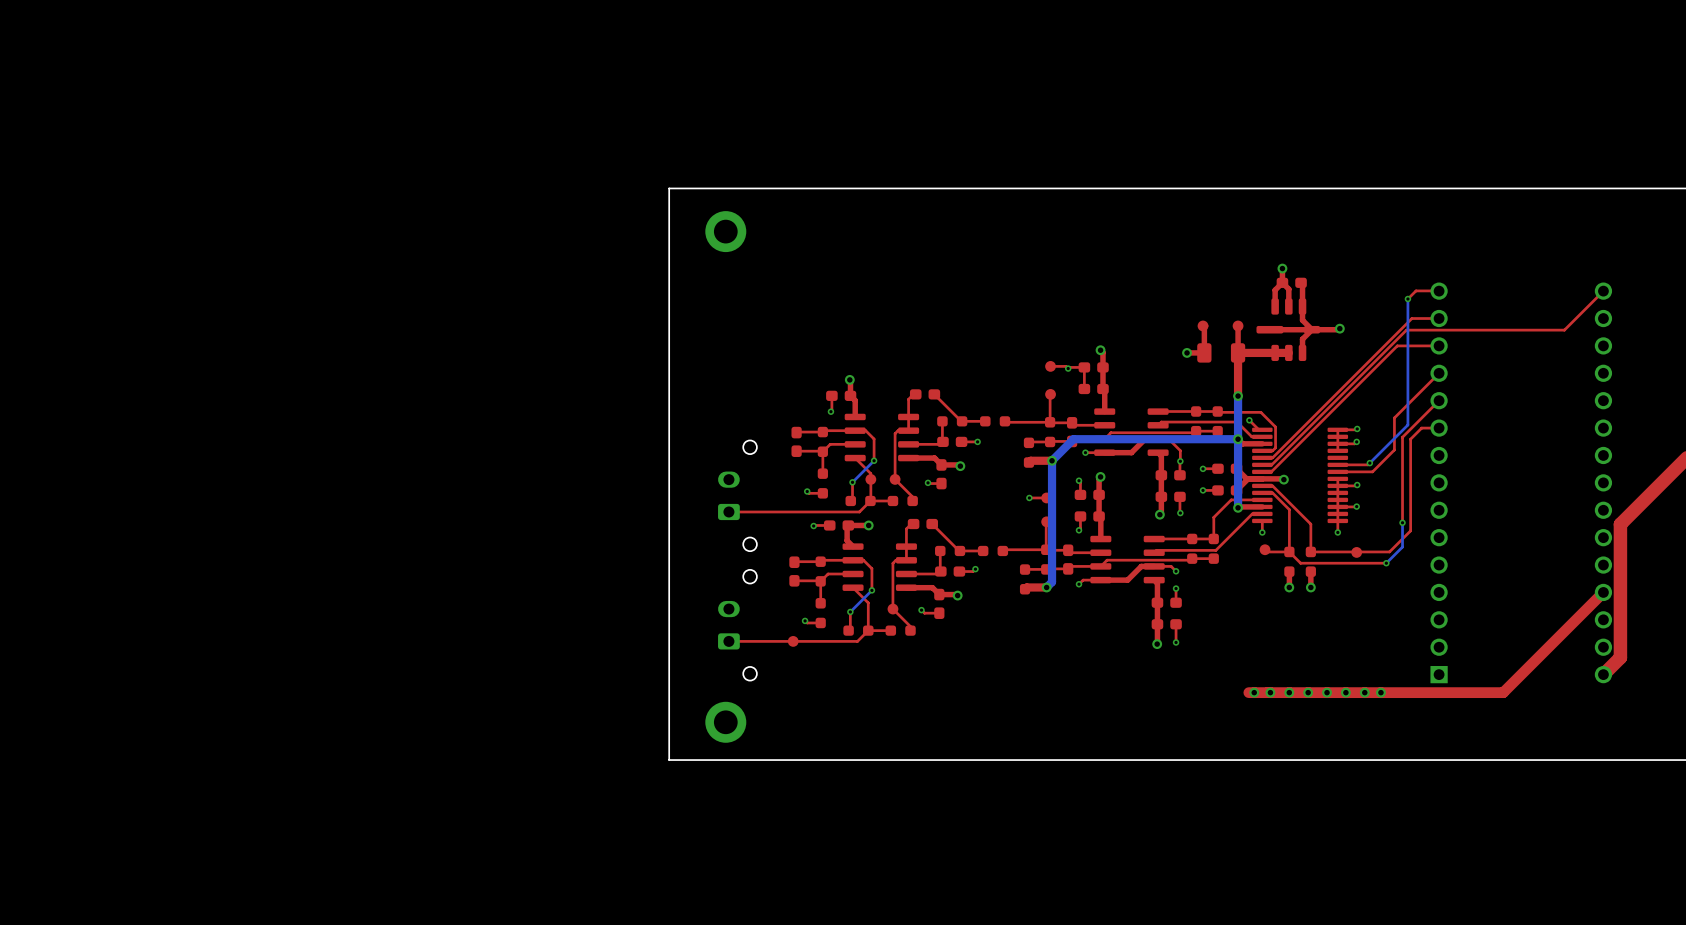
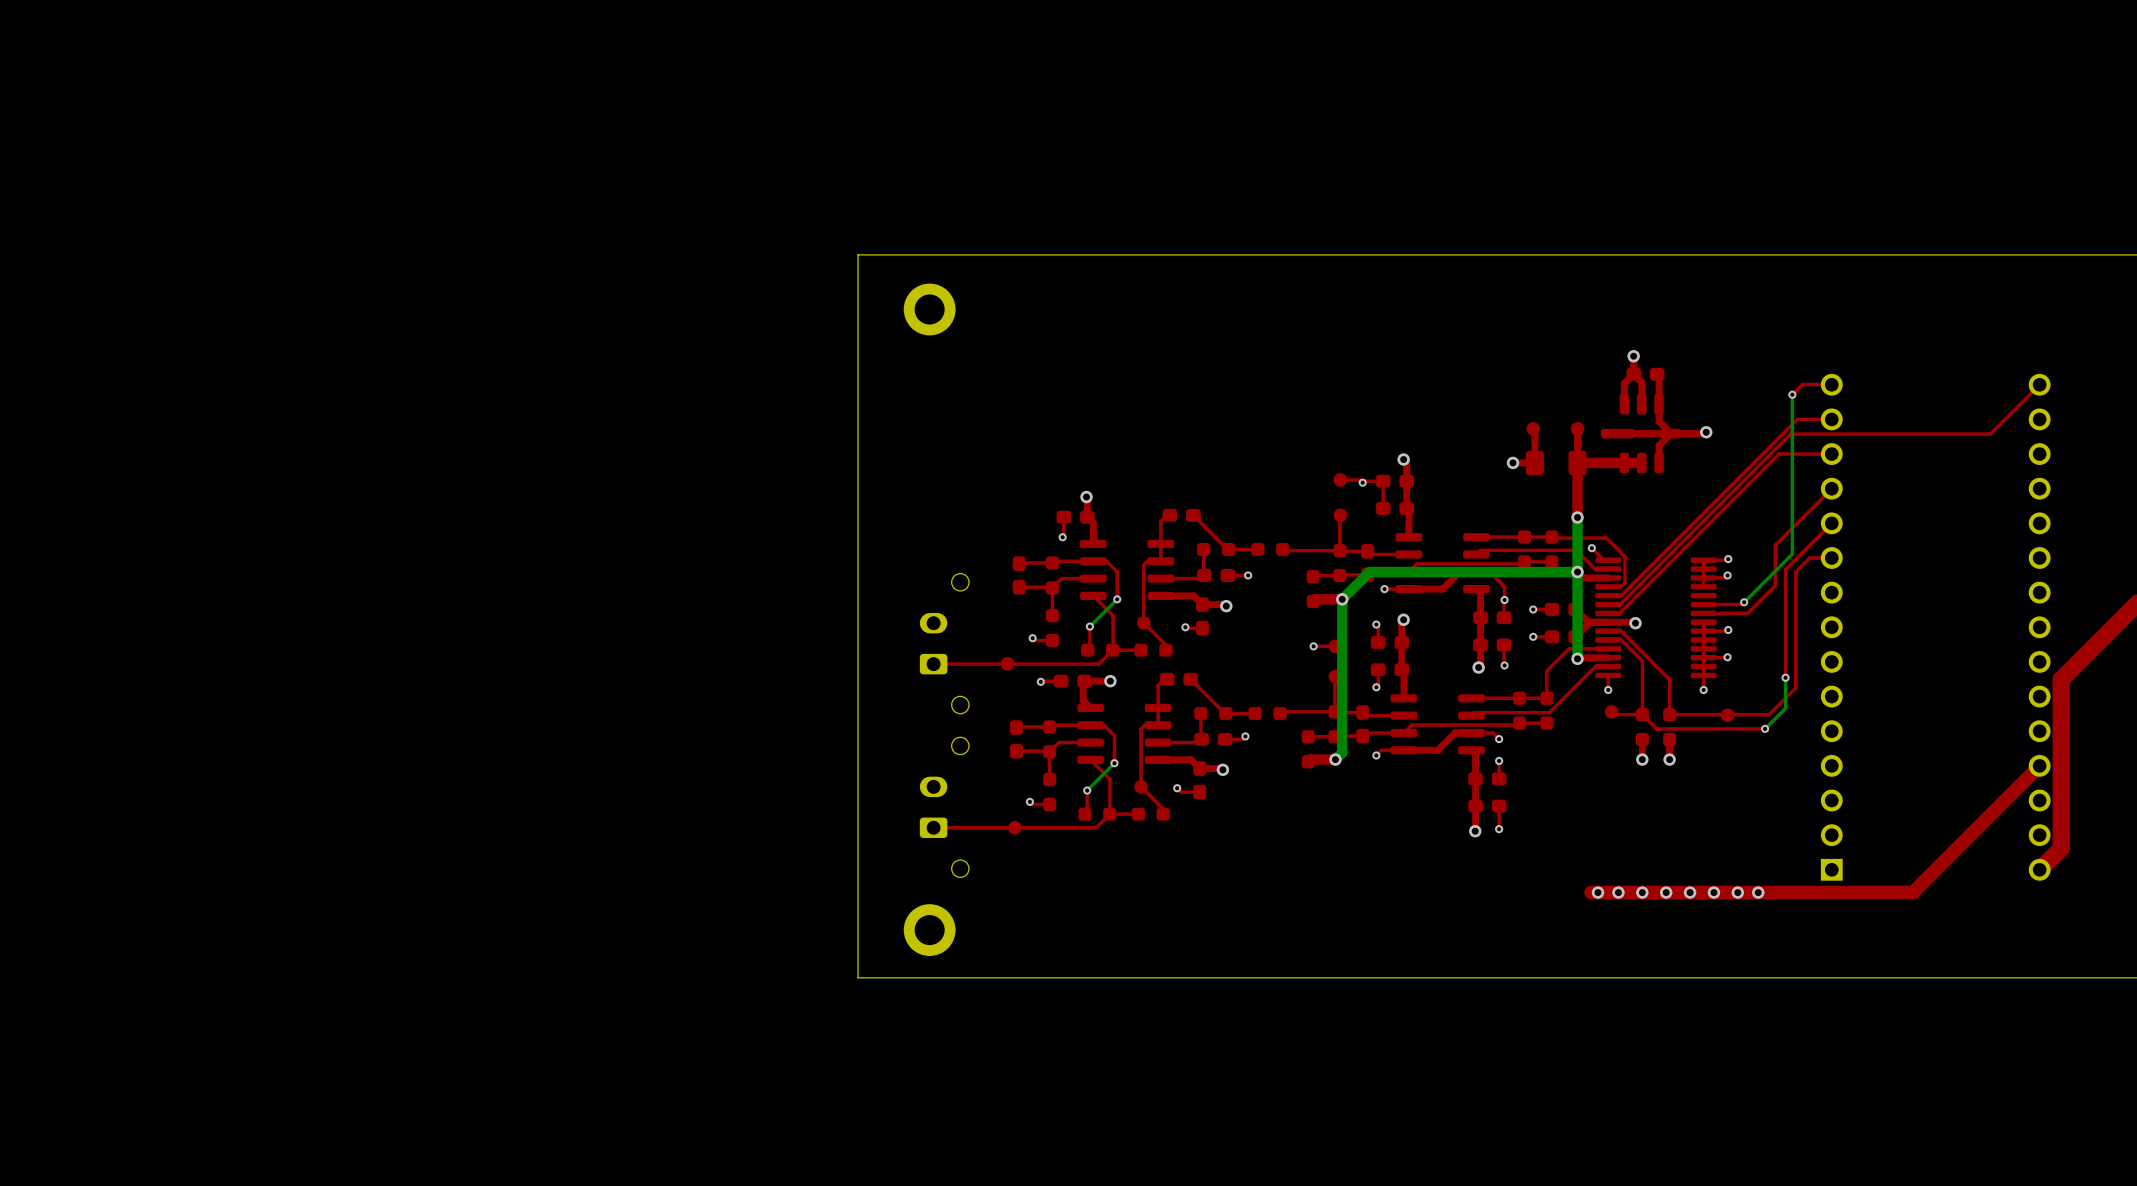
part position: (870, 479) -> (1007, 663)

